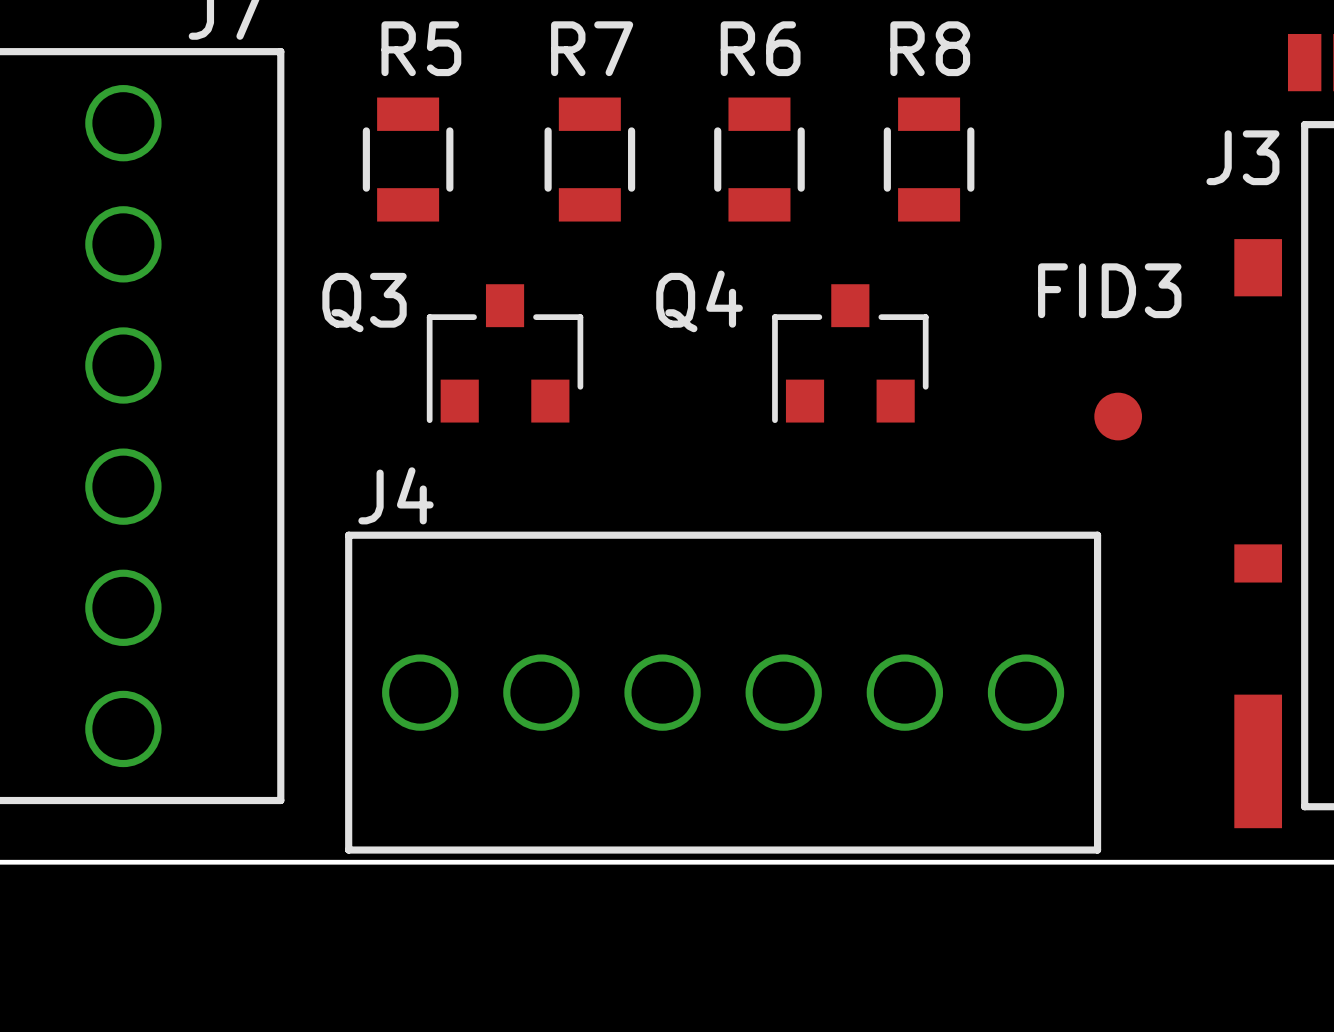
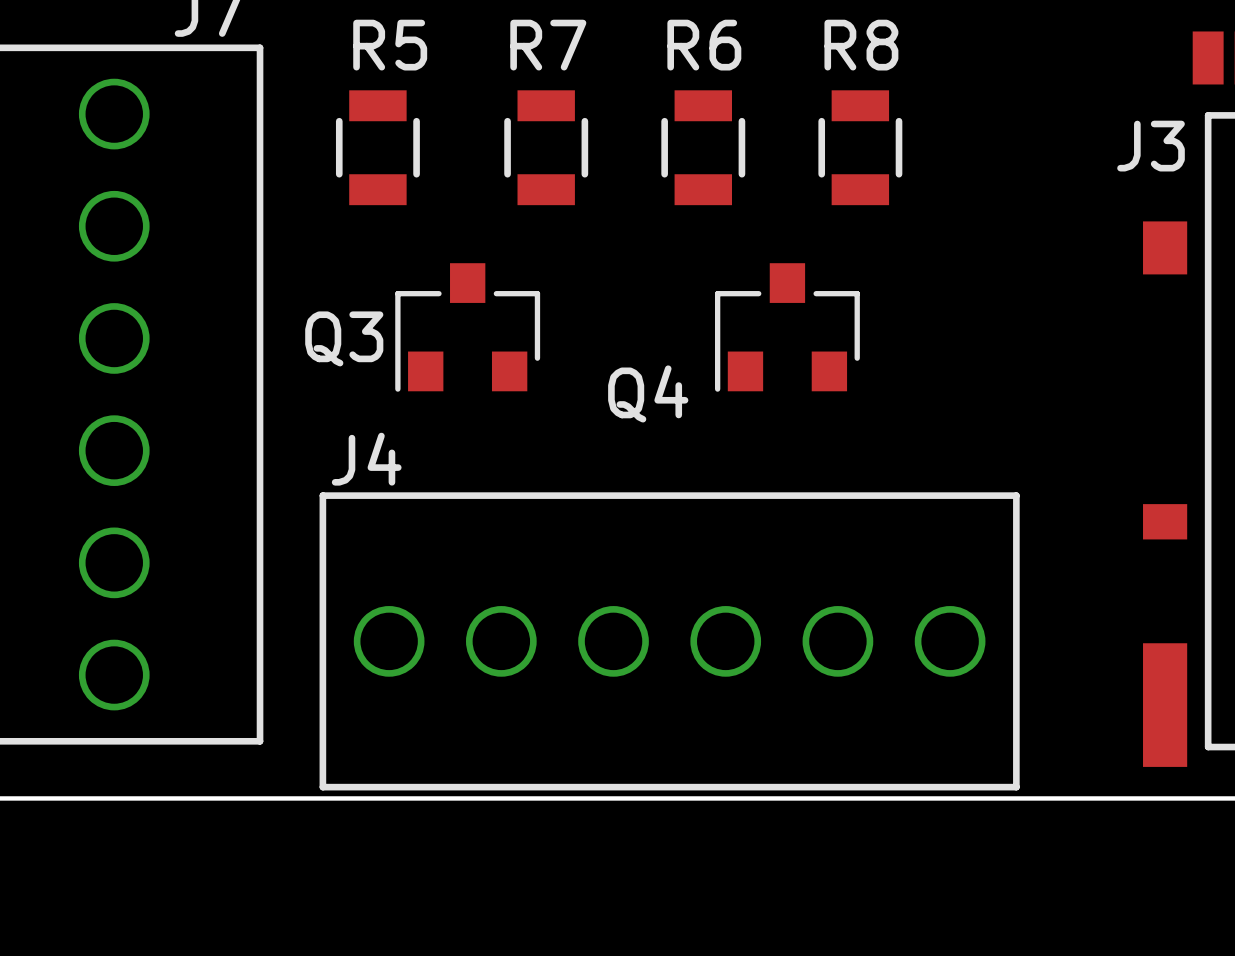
Q4 name position: Q4 (699, 301) -> Q4 (648, 393)
Q3 name position: Q3 (364, 302) -> Q3 (344, 338)
FID3: (1118, 416) -> none

